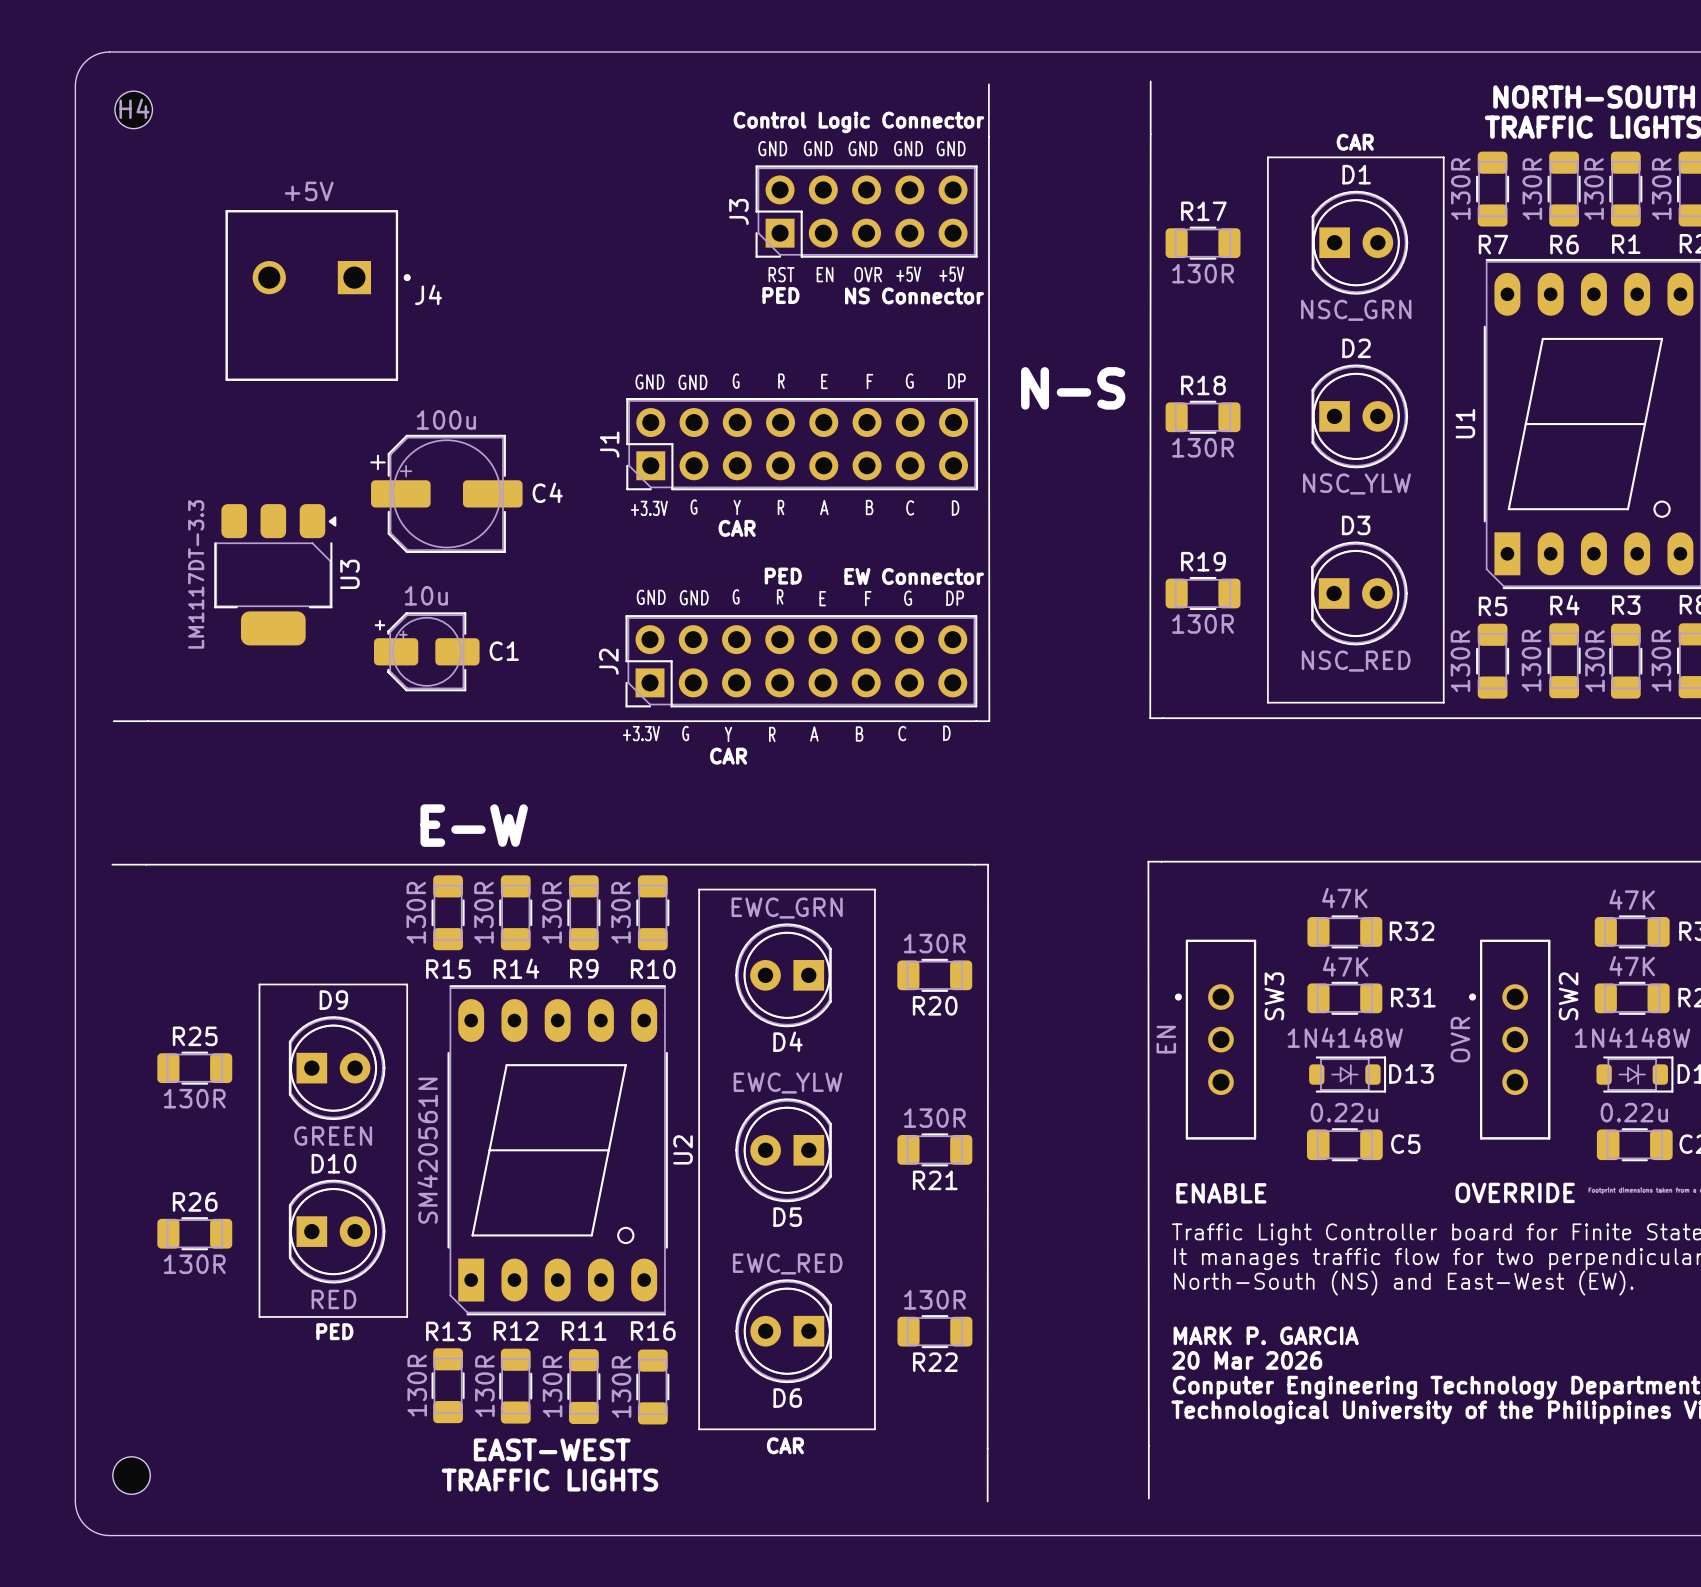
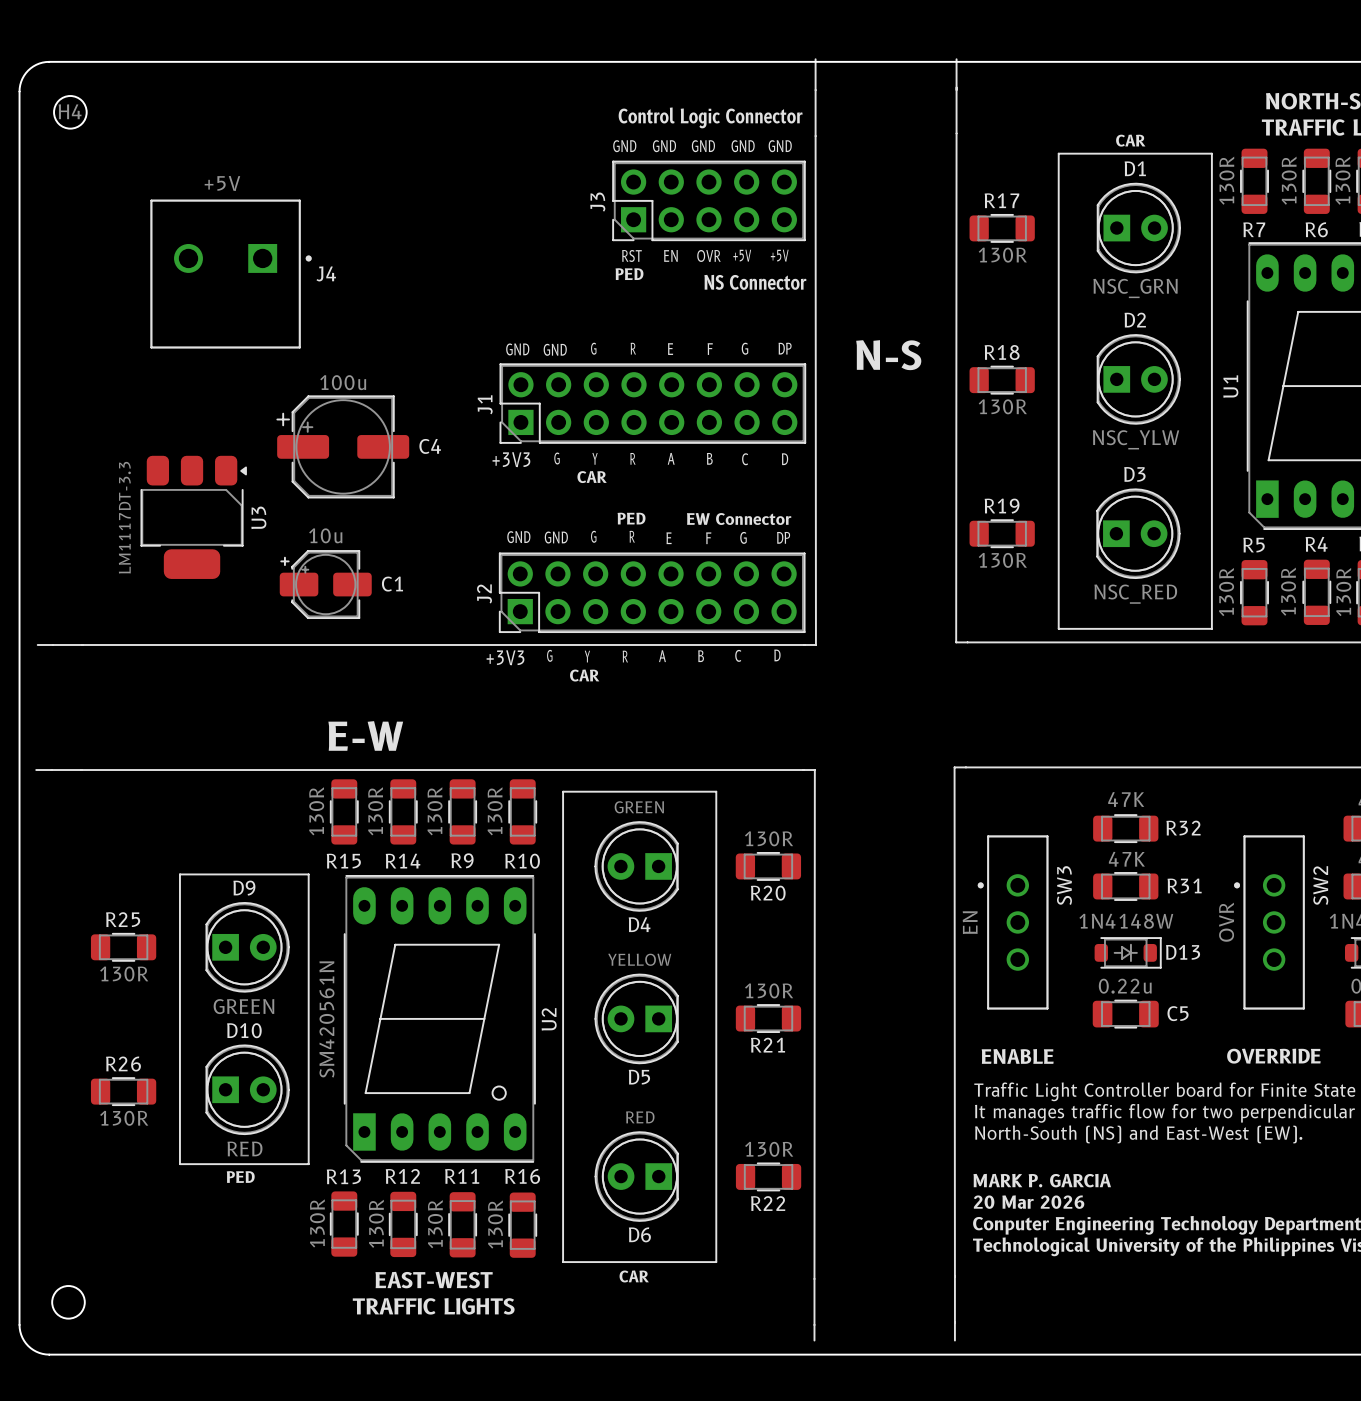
line: none -> (815, 59) (815, 90)
line: none -> (956, 59) (956, 87)
text position: Control Logic Connector (858, 122) -> Control Logic Connector (710, 117)
text position: NS Connector (914, 295) -> NS Connector (755, 282)
text: +3.3V (649, 508) -> +3V3 (511, 459)
line: none -> (37, 644) (52, 644)
text: +3.3V (641, 733) -> +3V3 (505, 657)
line: none -> (36, 770) (51, 770)
D4 value: EWC_GRN (787, 908) -> GREEN (639, 807)
D5 value: EWC_YLW (788, 1083) -> YELLOW (639, 959)
D6 value: EWC_RED (787, 1263) -> RED (640, 1117)
line: none -> (954, 1322) (954, 1340)
line: none -> (814, 1324) (814, 1340)

